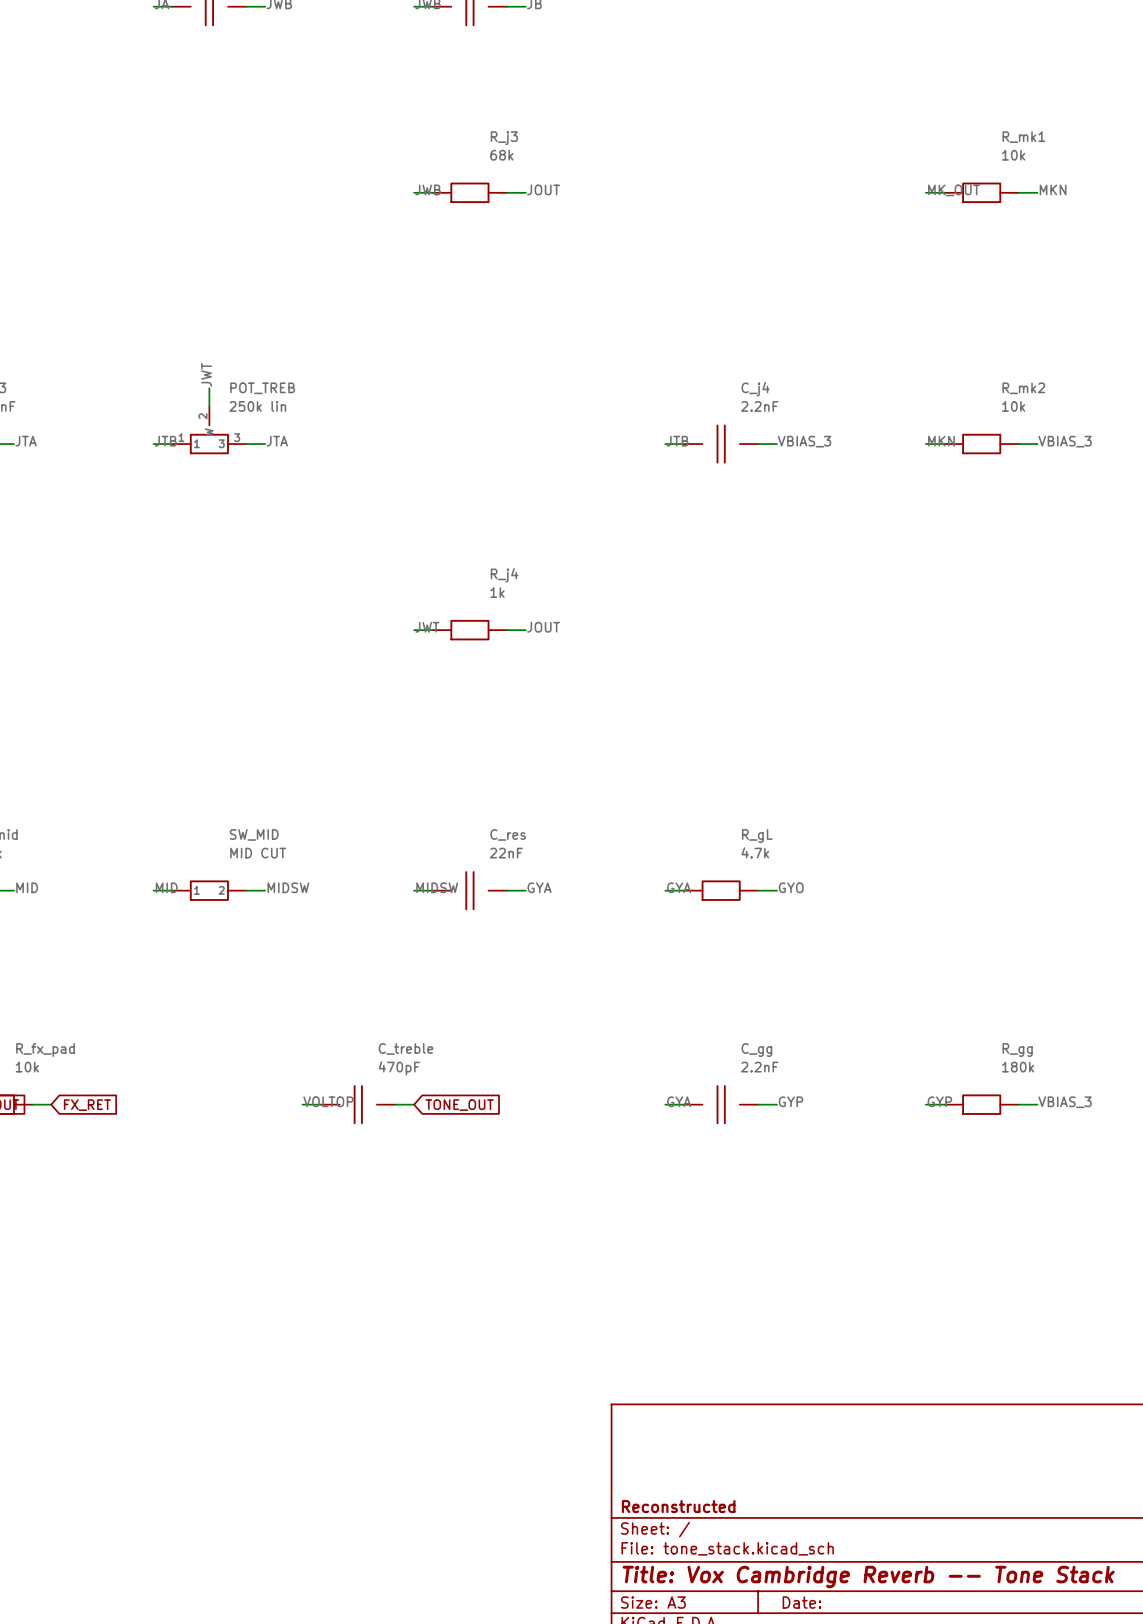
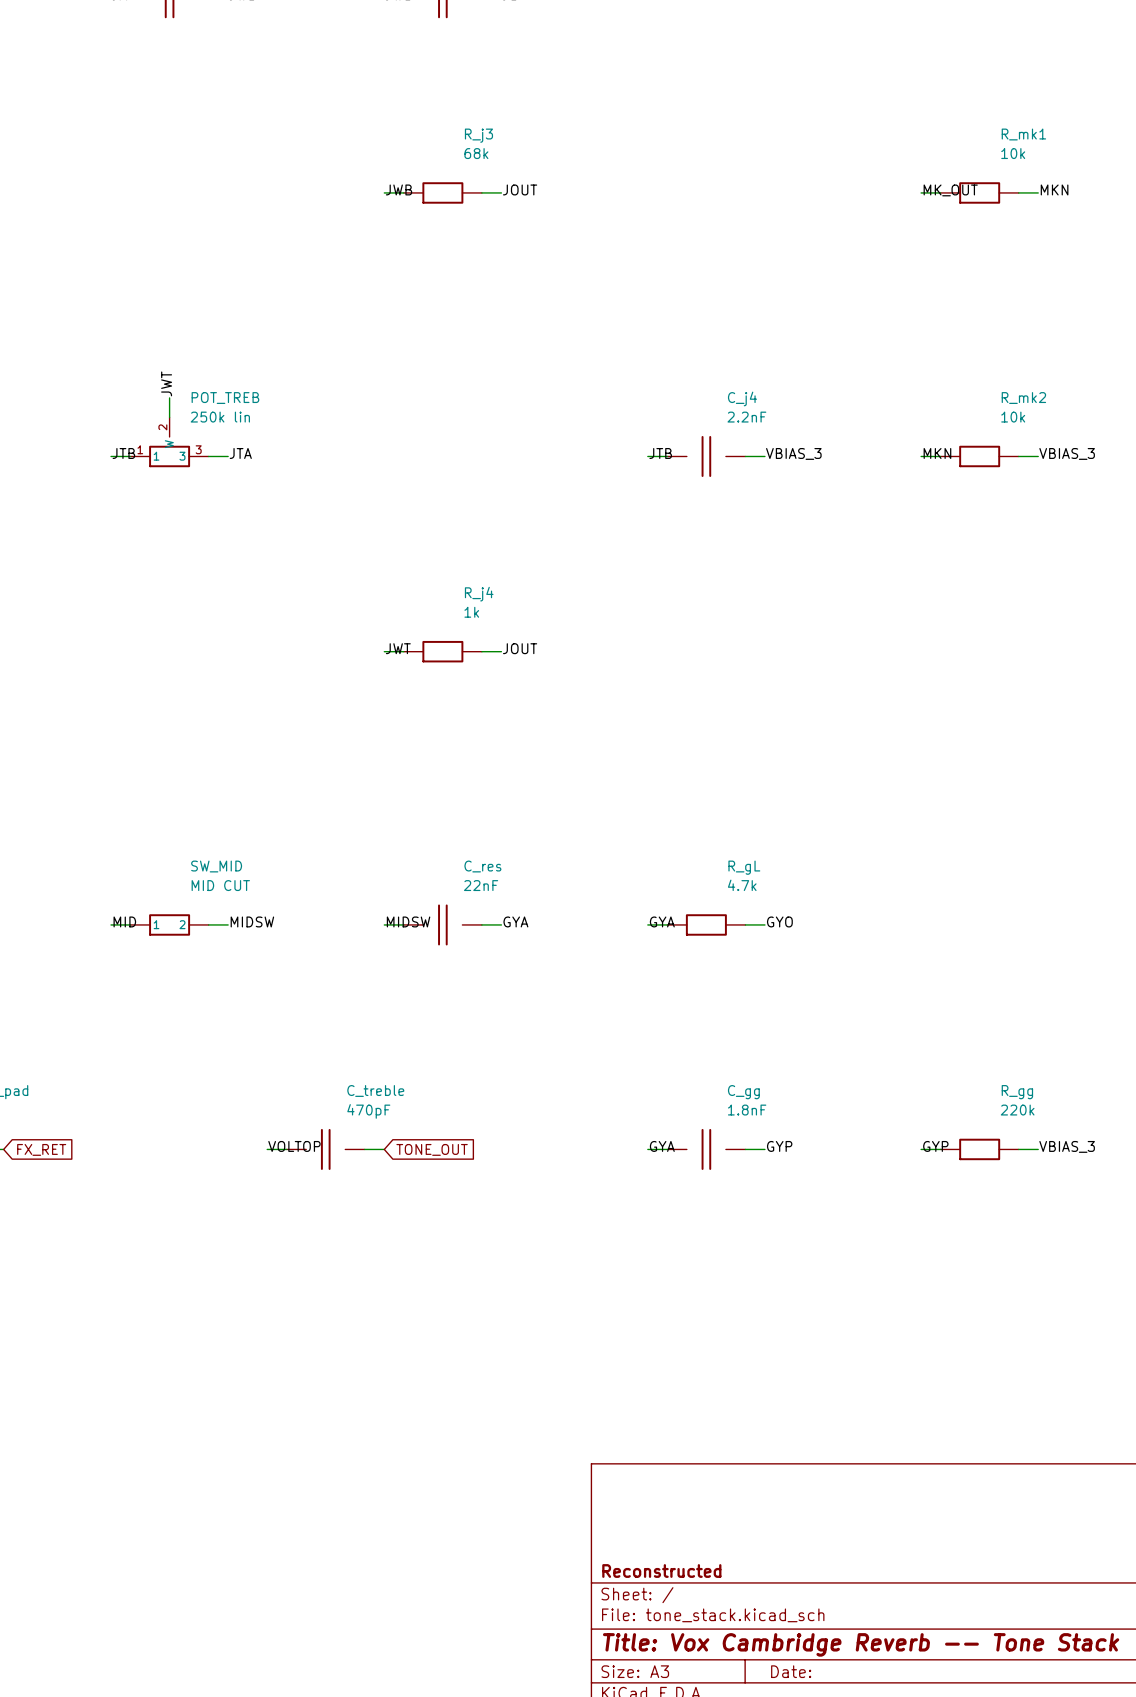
C_gg value: 2.2nF (759, 1067) -> 1.8nF (747, 1110)
R_gg value: 180k (1018, 1067) -> 220k (1017, 1110)

